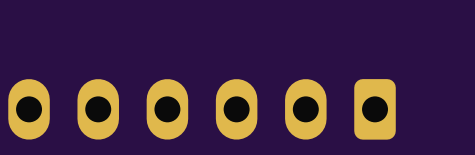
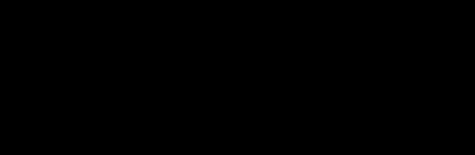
part: (202, 109) -> none

